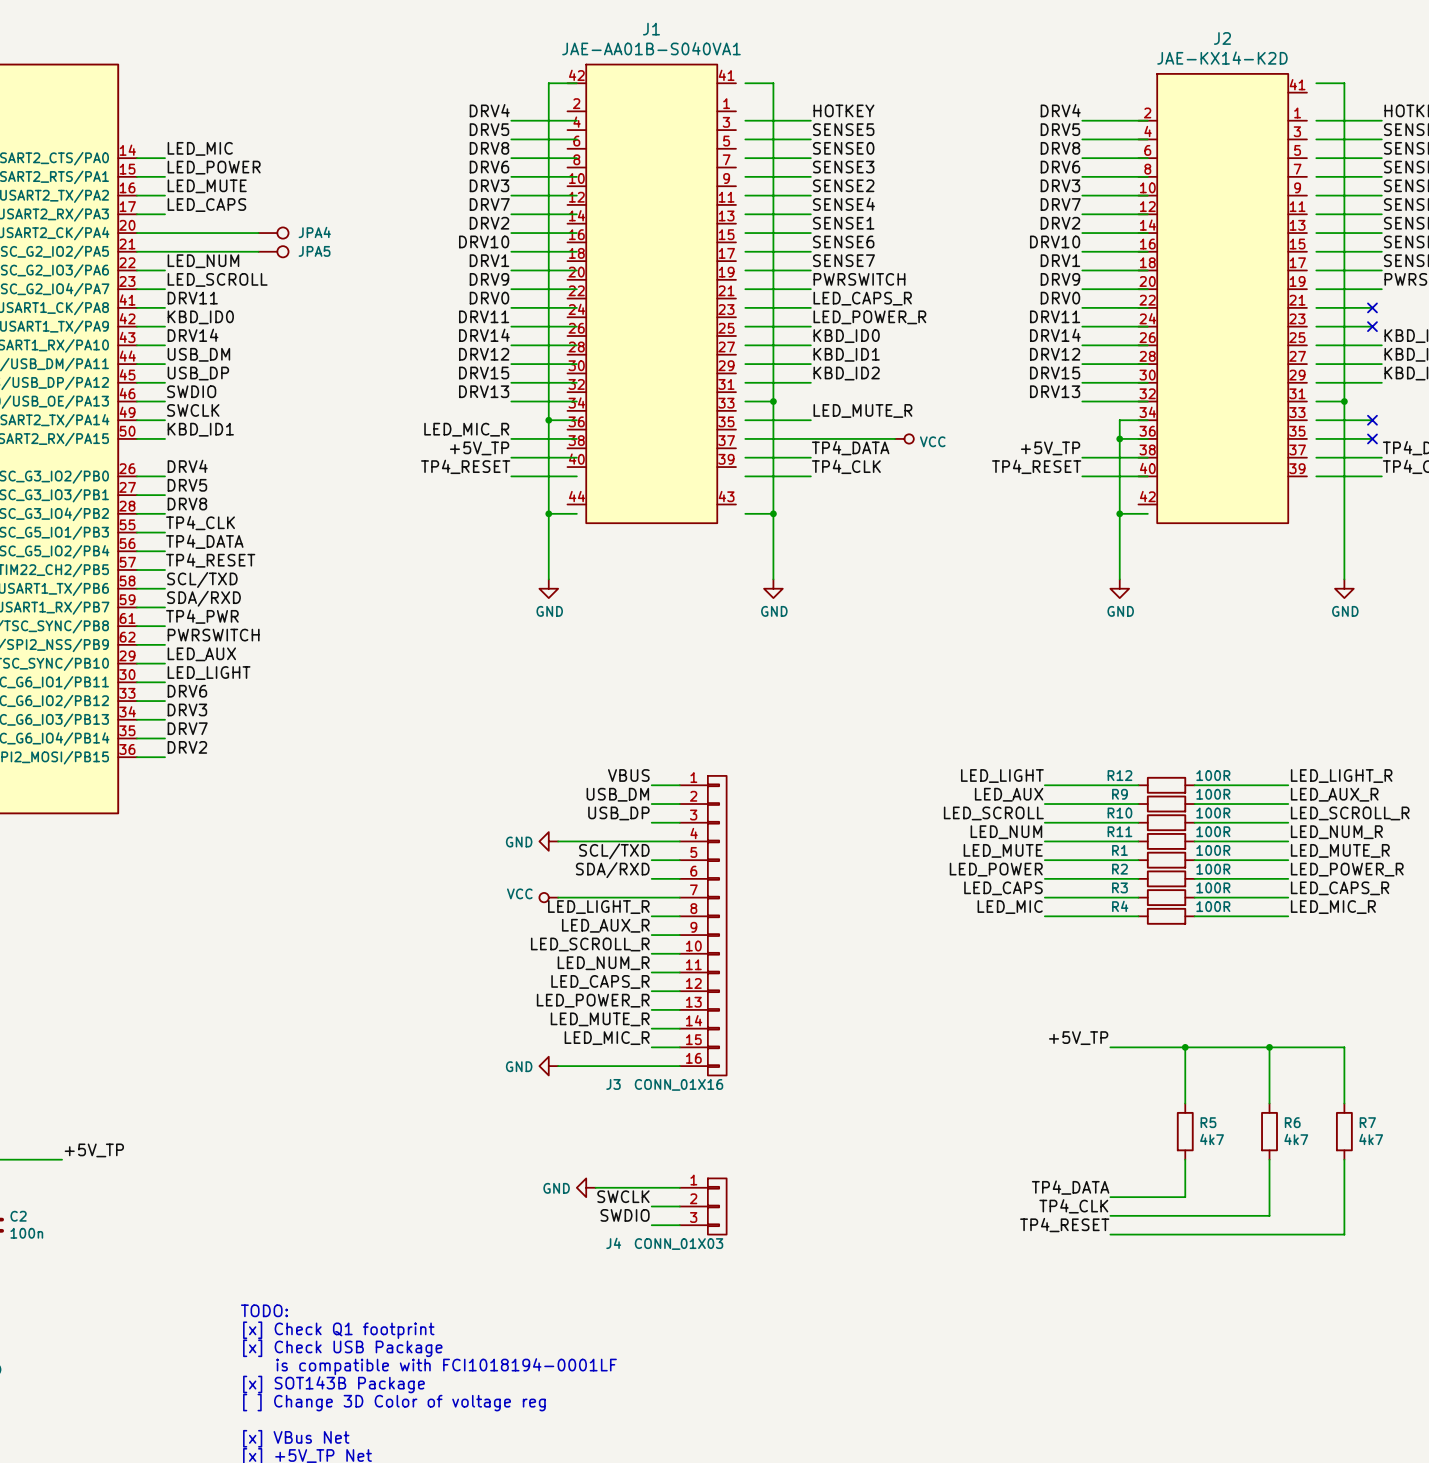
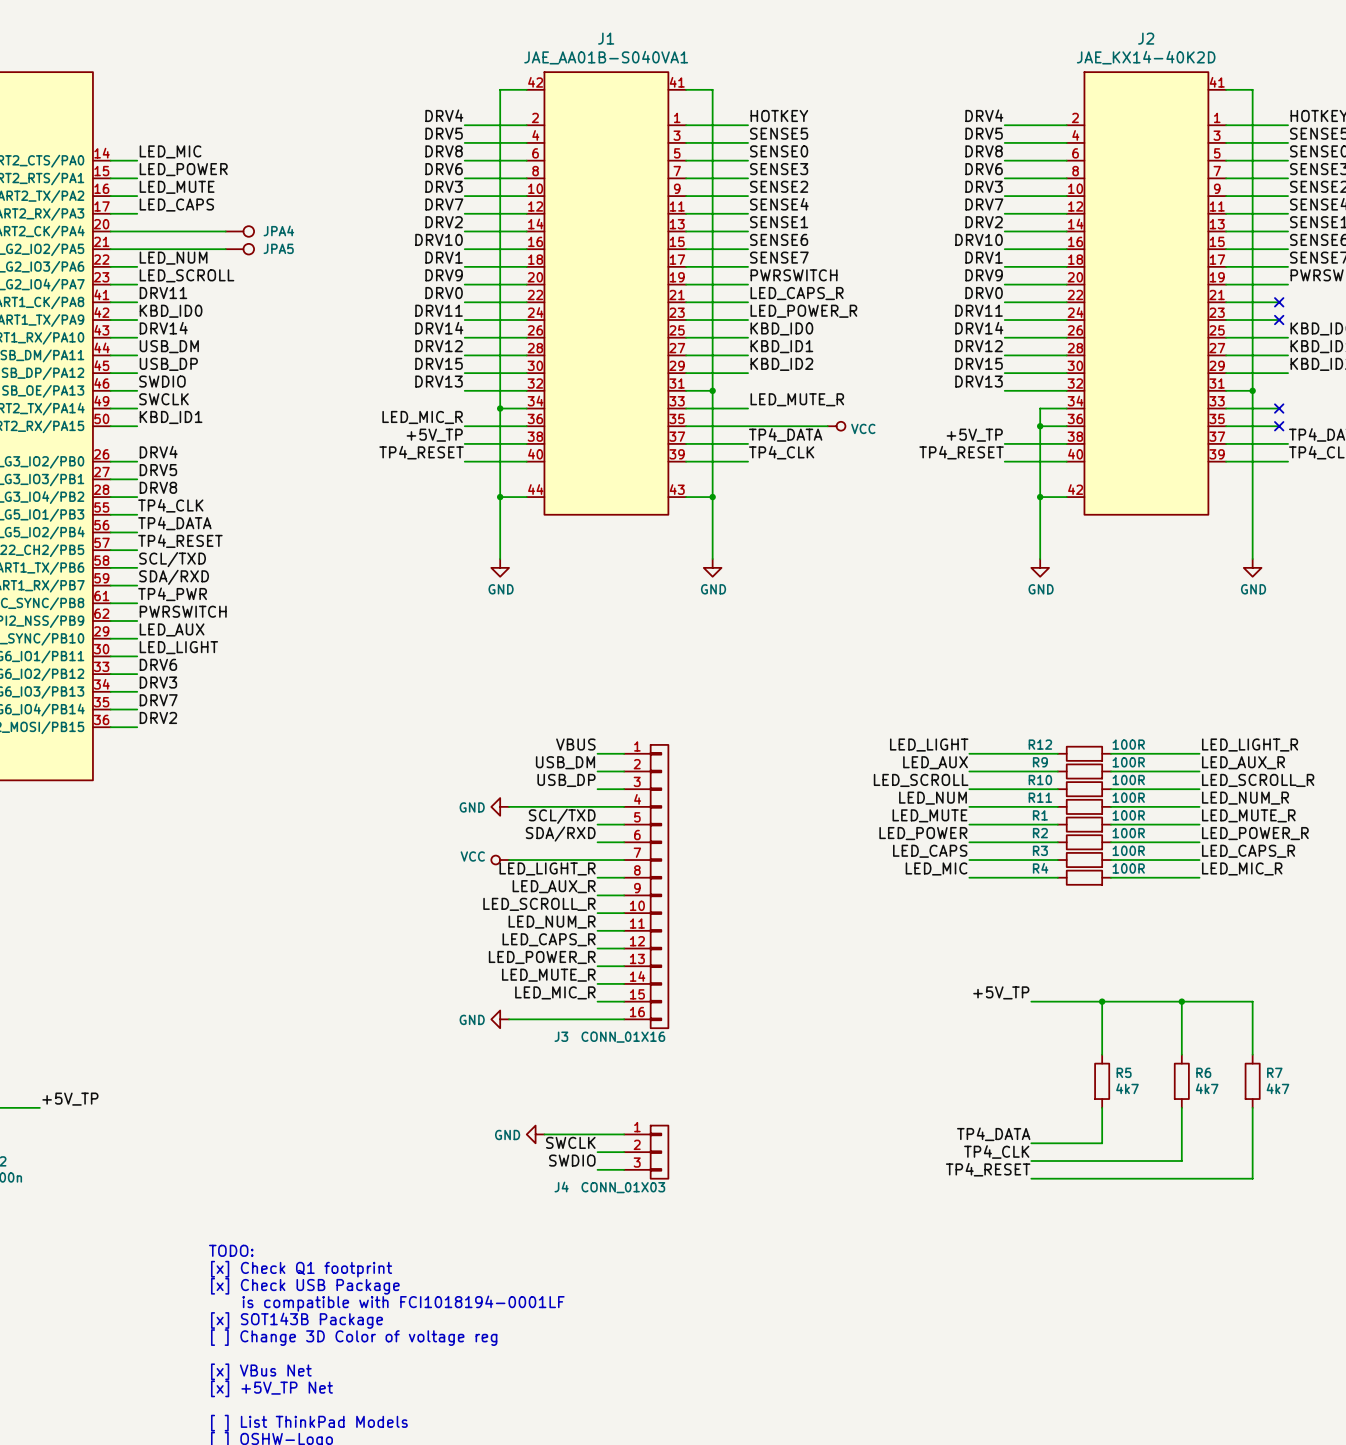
J1 value: JAE-AA01B-S040VA1 (651, 48) -> JAE_AA01B-S040VA1 (606, 57)
J2 value: JAE-KX14-K2D (1222, 58) -> JAE_KX14-40K2D (1146, 57)
J1 symbol: [567, 64, 736, 524] -> [526, 72, 687, 515]
J2 symbol: [1138, 73, 1307, 524] -> [1066, 72, 1227, 515]

